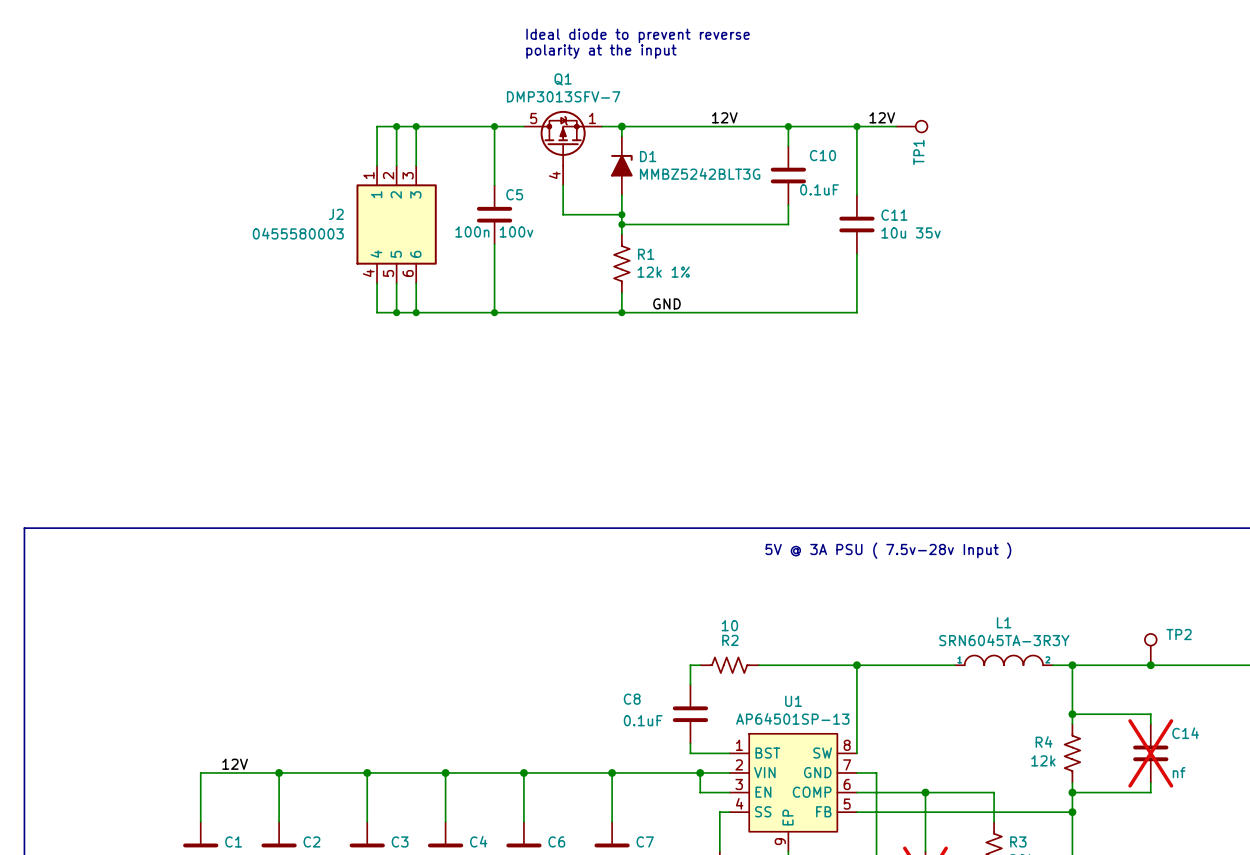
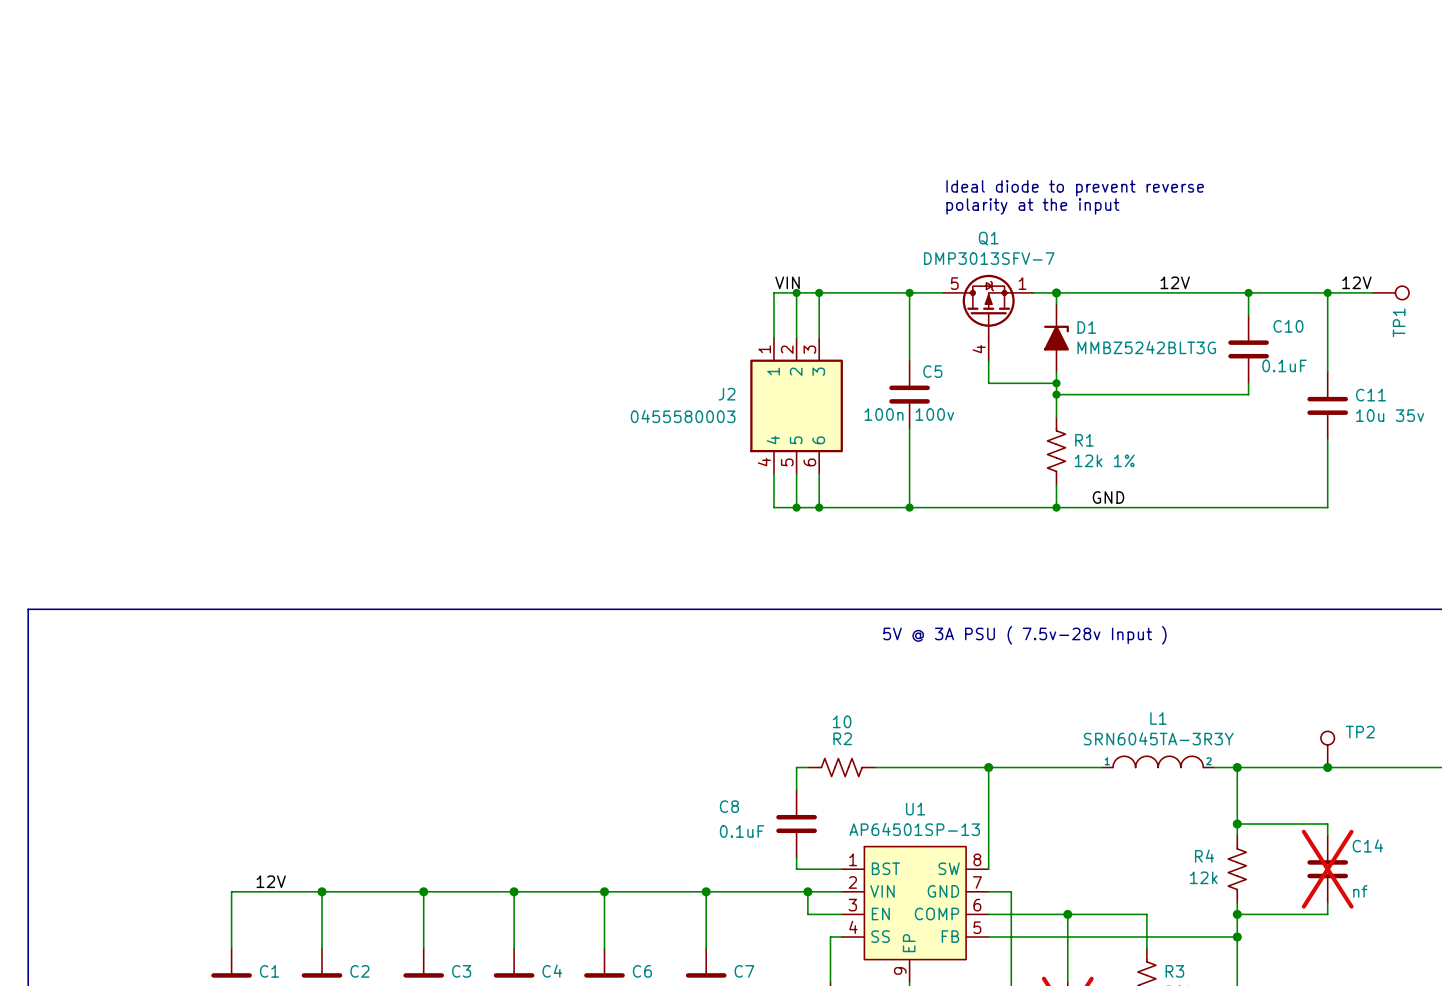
text: Ideal diode to prevent reverse (638, 35) -> none
text: polarity at the input (601, 51) -> none
label: 12V (724, 117) -> none
label: 12V (882, 117) -> none
wire: (396, 126) (396, 165) -> none
junction: (396, 126) -> none
wire: (416, 126) (416, 165) -> none
junction: (416, 126) -> none
wire: (494, 126) (494, 185) -> none
junction: (494, 126) -> none
wire: (523, 126) (377, 126) (377, 165) -> none
wire: (602, 126) (896, 126) -> none
wire: (621, 126) (621, 136) -> none
junction: (621, 126) -> none
wire: (788, 126) (788, 146) -> none
junction: (788, 126) -> none
wire: (856, 126) (856, 195) -> none
junction: (856, 126) -> none
TP1 position: (911, 126) -> (1390, 292)
Q1 position: (563, 148) -> (988, 317)
text: none -> Ideal diode to prevent reverse (1075, 188)
D1 position: (621, 165) -> (1056, 338)
C10 position: (788, 175) -> (1248, 349)
text: none -> polarity at the input (1032, 206)
wire: (563, 185) (563, 214) (621, 214) -> none
wire: (621, 195) (621, 234) -> (796, 292) (796, 338)
wire: (788, 204) (788, 224) (621, 224) -> none
C5 position: (494, 214) -> (909, 394)
junction: (621, 214) -> none
J2 position: (396, 224) -> (796, 405)
junction: (621, 224) -> none
C11 position: (856, 224) -> (1327, 405)
wire: (494, 244) (494, 312) -> none
label: none -> VIN (787, 282)
label: none -> 12V (1175, 282)
label: none -> 12V (1356, 282)
junction: none -> (796, 292)
wire: none -> (819, 292) (819, 338)
junction: none -> (819, 292)
wire: none -> (909, 292) (909, 360)
junction: none -> (909, 292)
wire: none -> (943, 292) (773, 292) (773, 338)
wire: (856, 253) (856, 312) (377, 312) (377, 283) -> none
wire: none -> (1033, 292) (1372, 292)
wire: none -> (1056, 292) (1056, 304)
junction: none -> (1056, 292)
wire: none -> (1248, 292) (1248, 315)
junction: none -> (1248, 292)
wire: none -> (1327, 292) (1327, 372)
junction: none -> (1327, 292)
R1 position: (621, 263) -> (1056, 451)
wire: (396, 283) (396, 312) -> none
wire: (416, 283) (416, 312) -> none
wire: (621, 293) (621, 312) -> none
label: GND (666, 303) -> none
junction: (396, 312) -> none
junction: (416, 312) -> none
junction: (494, 312) -> none
junction: (621, 312) -> none
wire: none -> (988, 360) (988, 383) (1056, 383)
wire: none -> (1056, 372) (1056, 417)
junction: none -> (1056, 383)
wire: none -> (1248, 383) (1248, 394) (1056, 394)
junction: none -> (1056, 394)
wire: none -> (909, 428) (909, 507)
wire: none -> (1327, 439) (1327, 507) (773, 507) (773, 473)
wire: none -> (796, 473) (796, 507)
wire: none -> (819, 473) (819, 507)
wire: none -> (1056, 485) (1056, 507)
label: none -> GND (1108, 497)
junction: none -> (796, 507)
junction: none -> (819, 507)
junction: none -> (909, 507)
junction: none -> (1056, 507)

